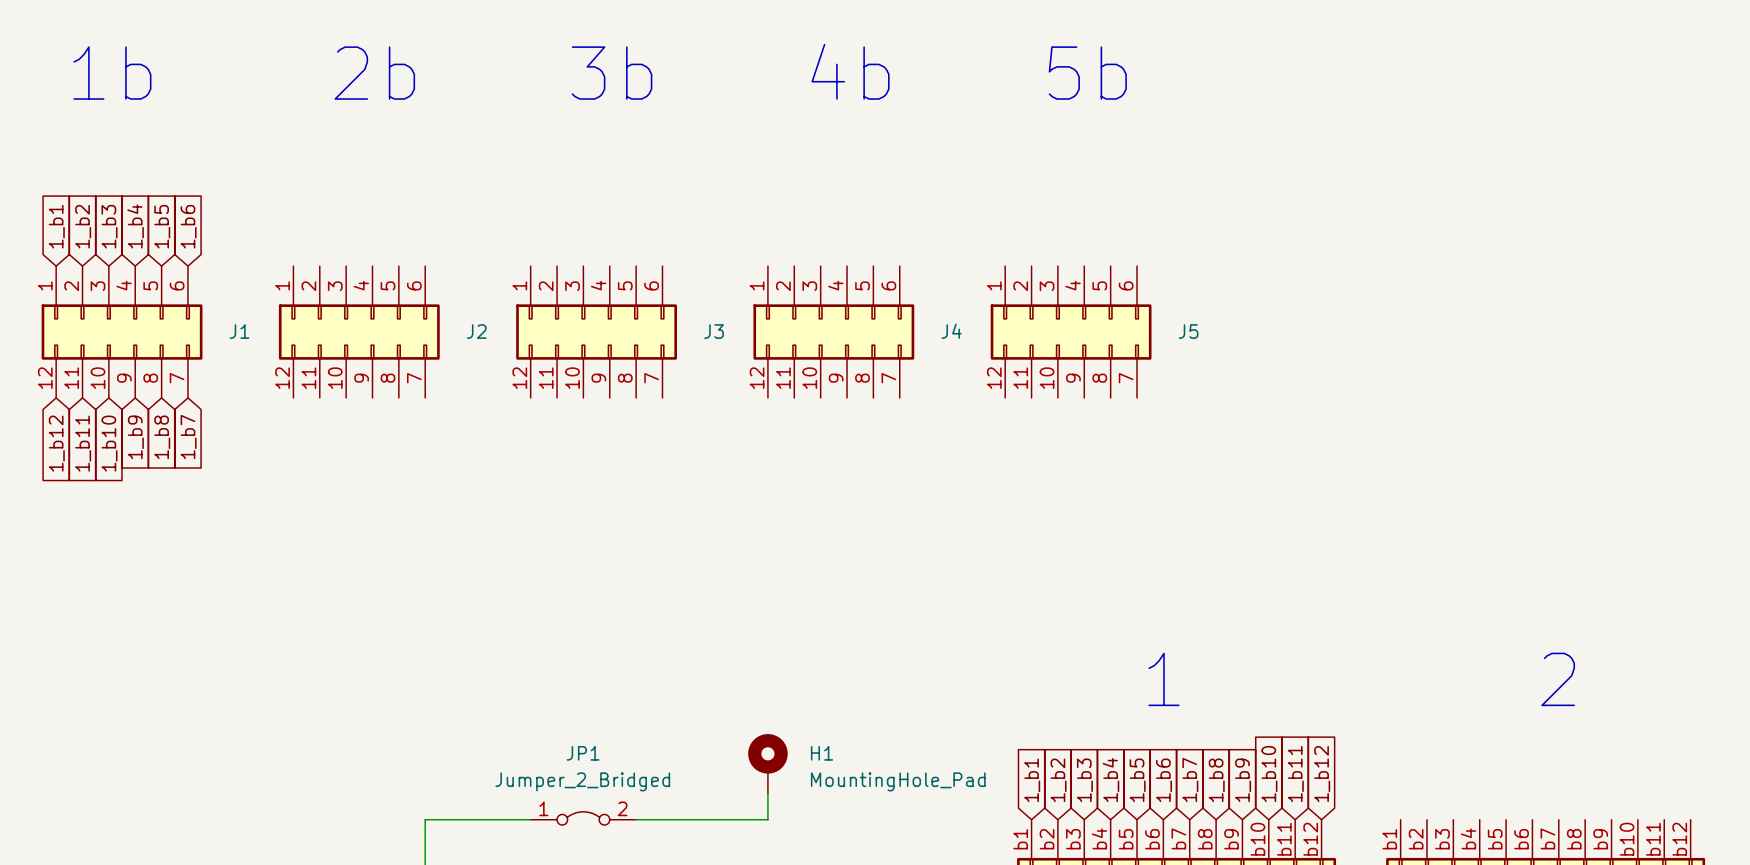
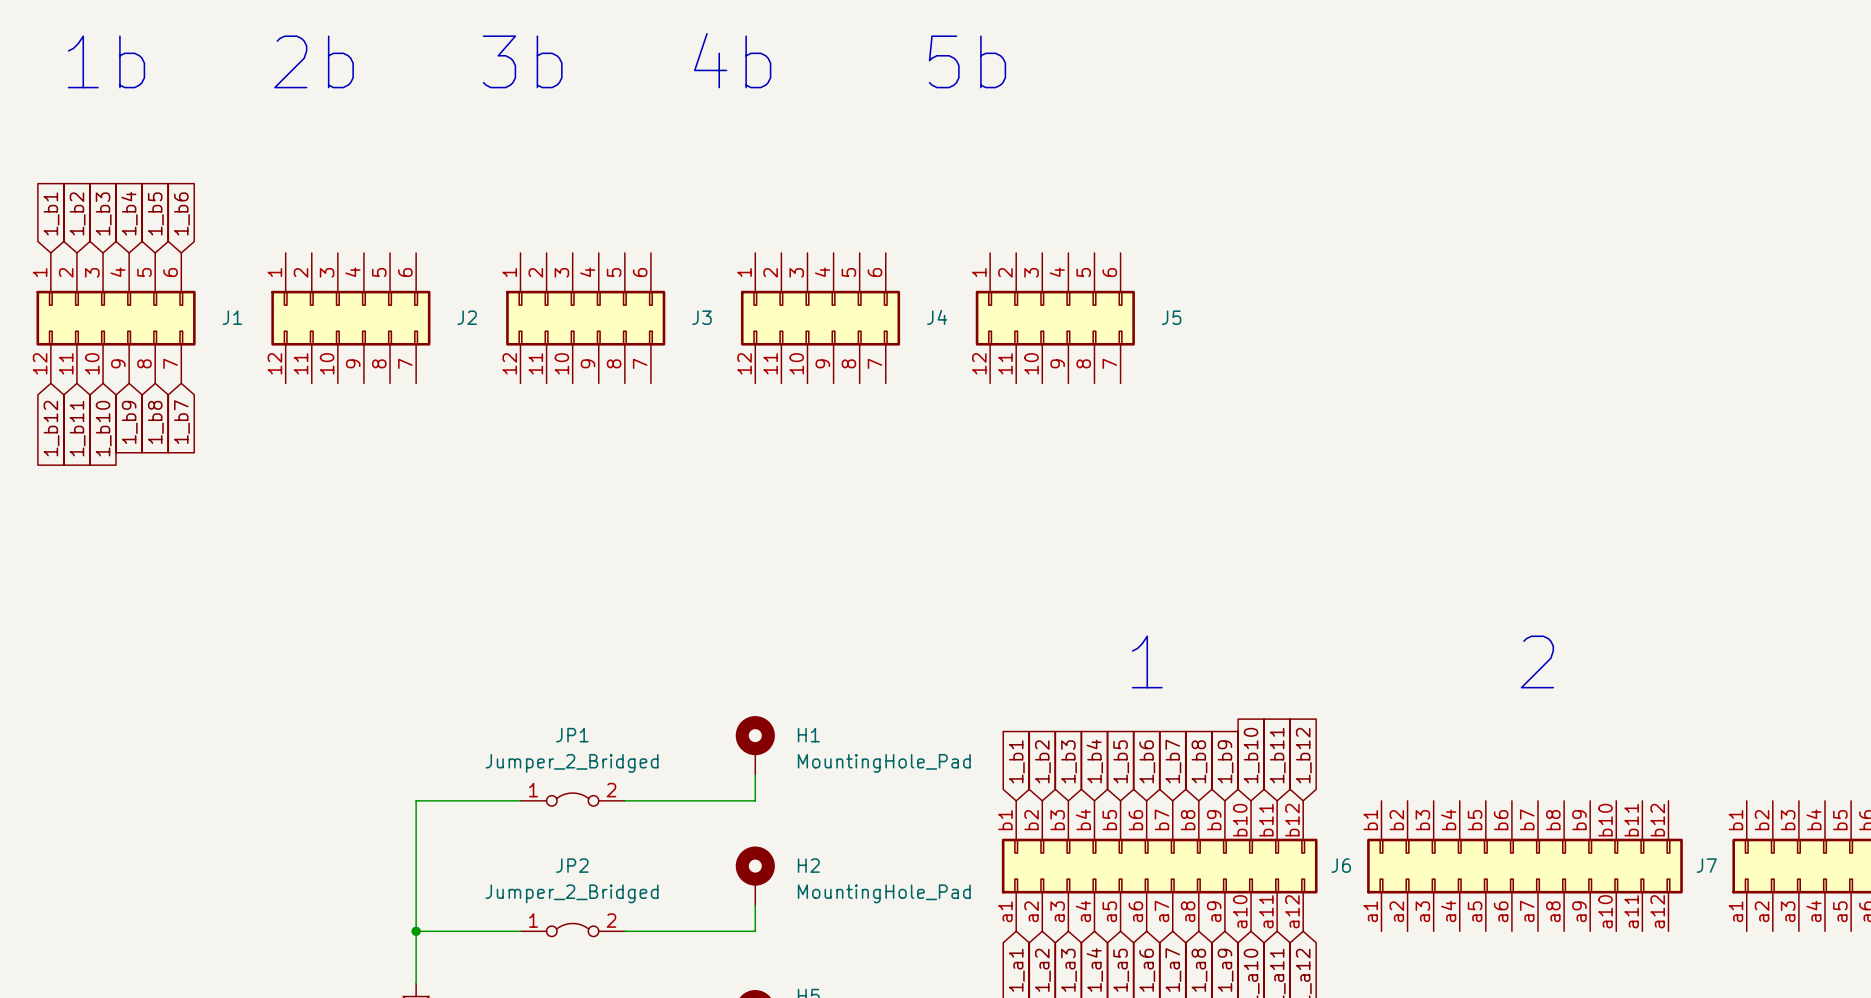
text position: 4b (850, 71) -> 4b (732, 60)
text position: 2b (374, 73) -> 2b (314, 61)
text position: 3b (612, 73) -> 3b (522, 61)
text position: 5b (1087, 73) -> 5b (967, 61)

